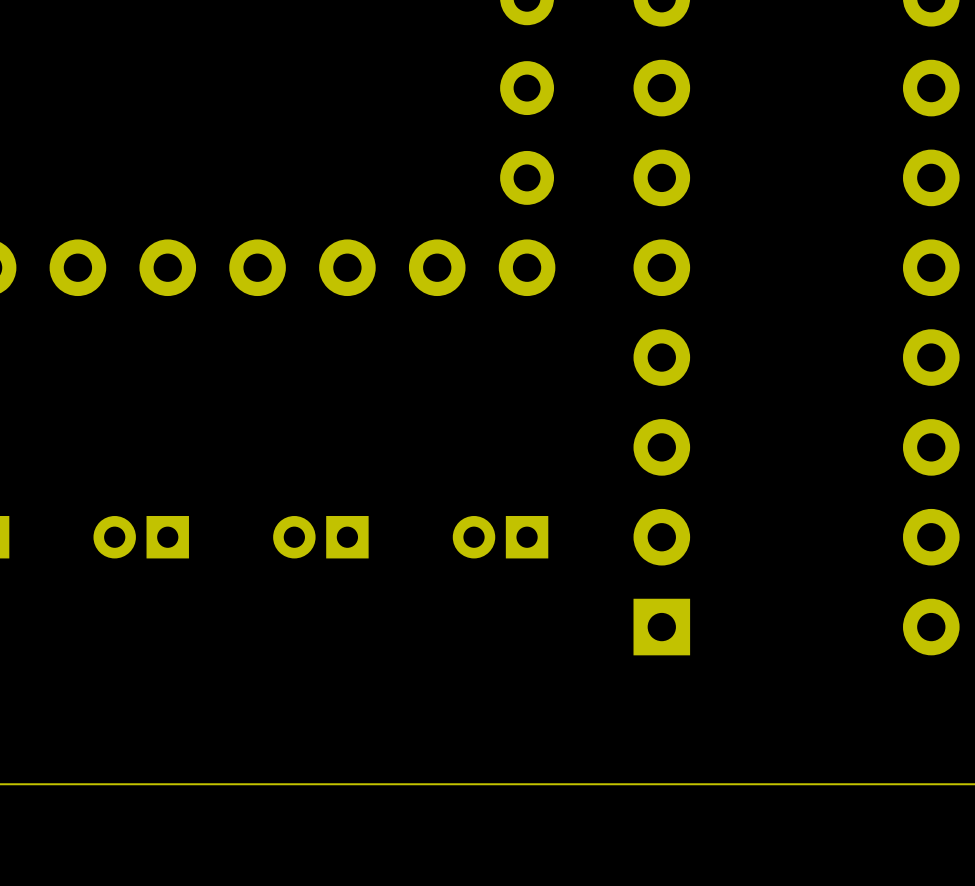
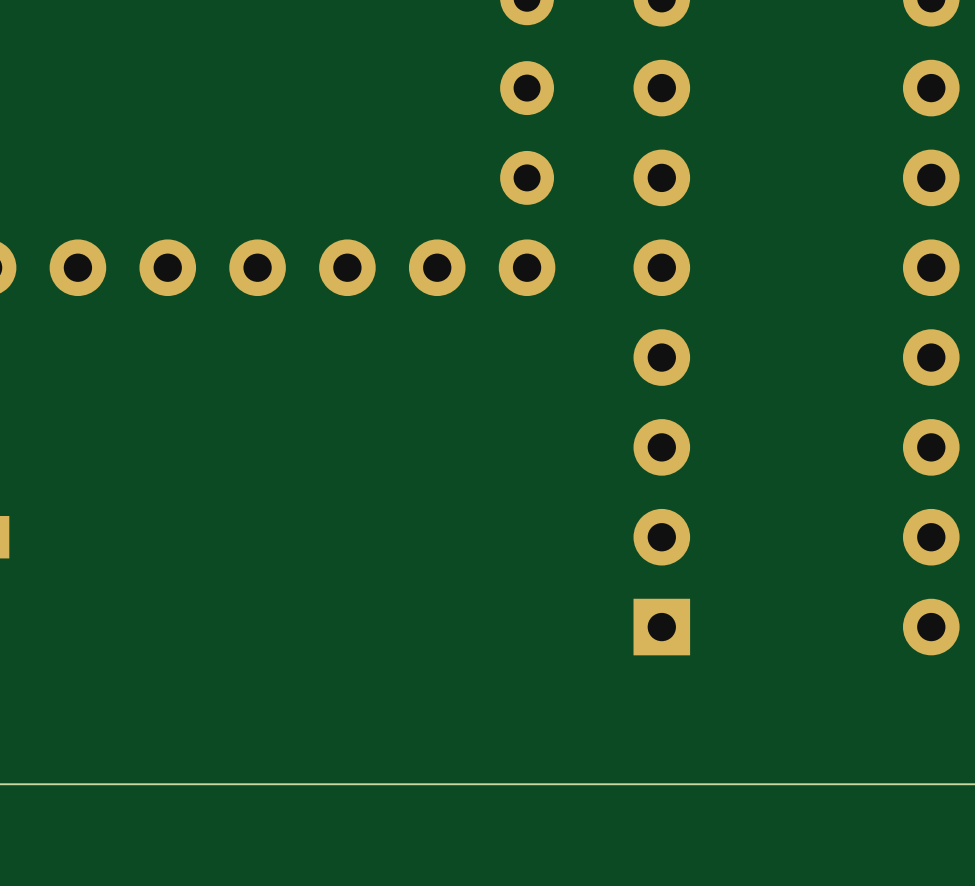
part: (141, 537) -> none
part: (320, 537) -> none
part: (500, 537) -> none

